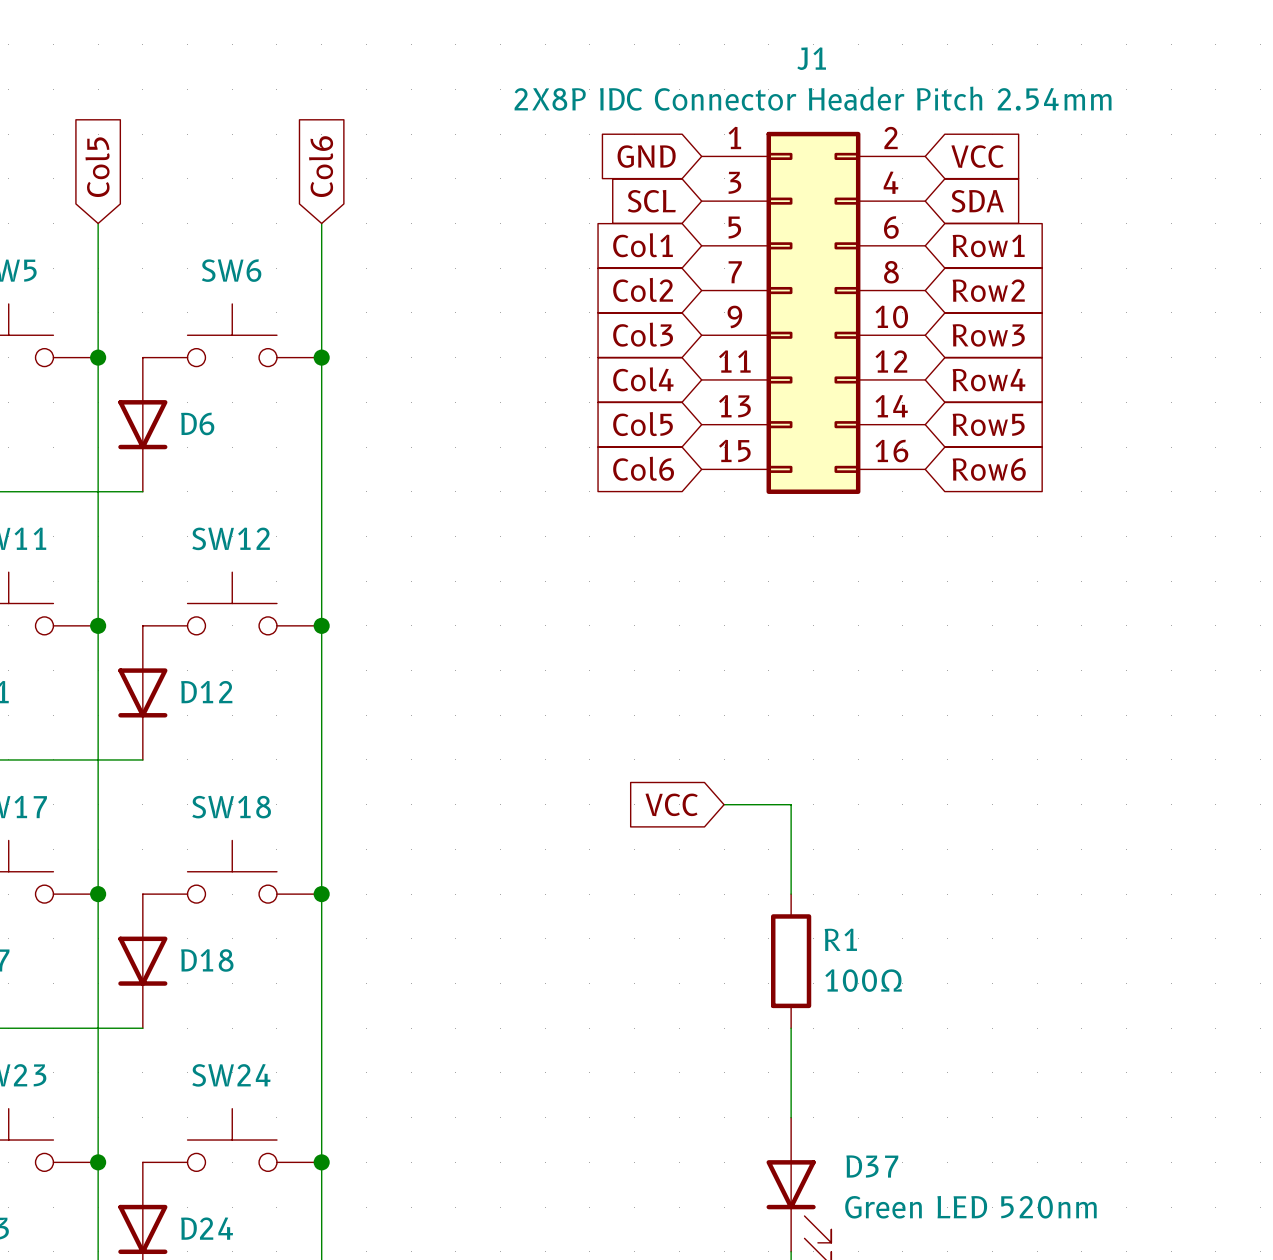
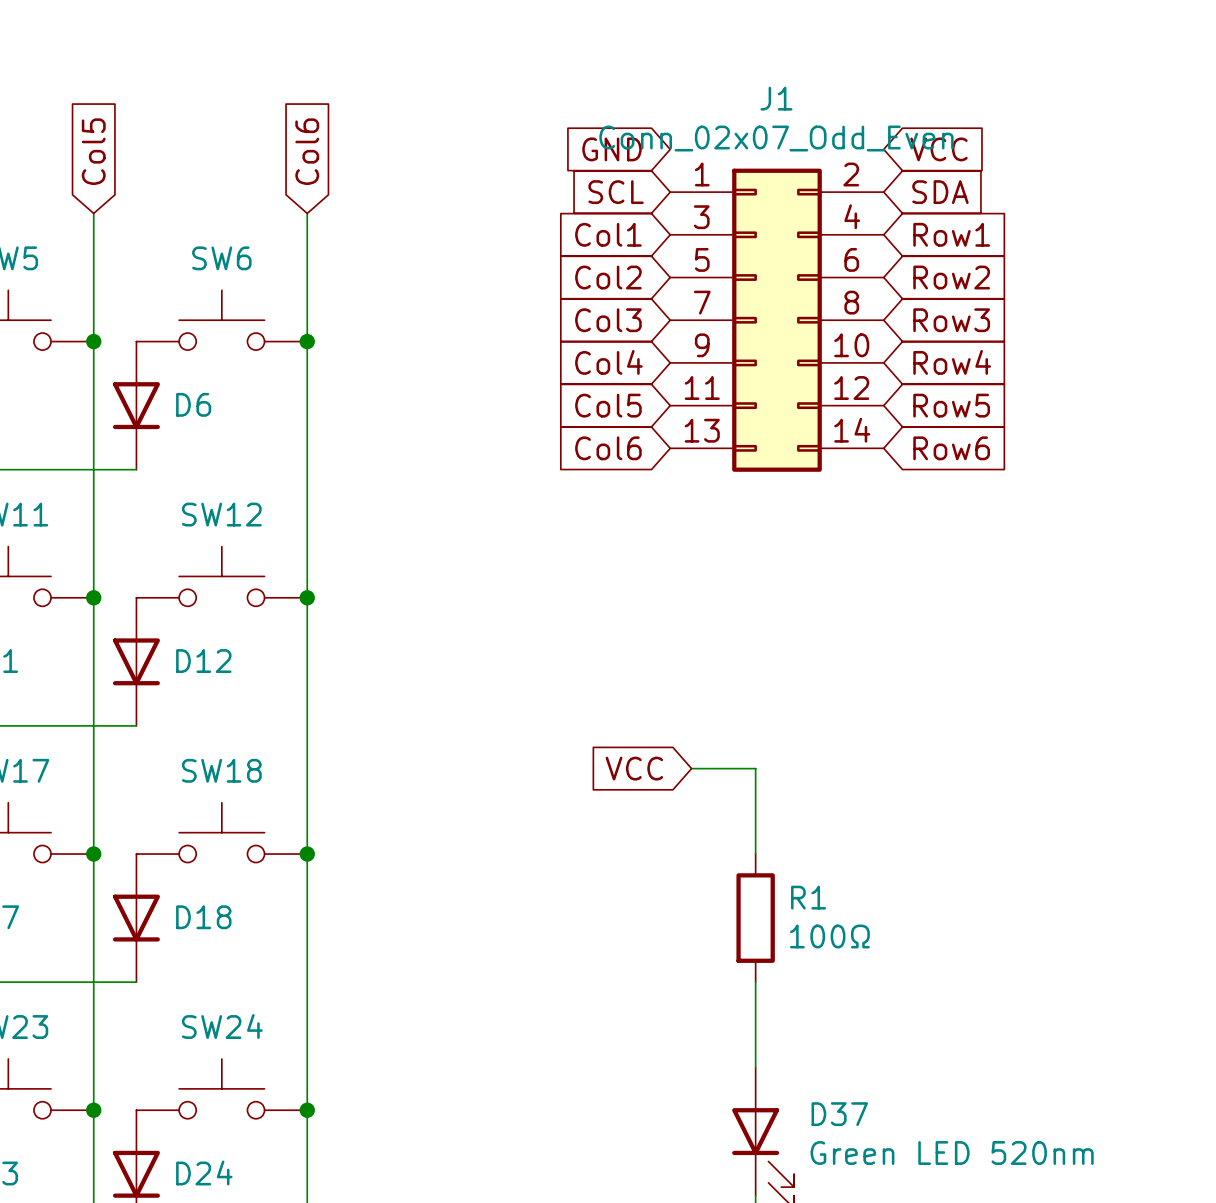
J1 value: 2X8P IDC Connector Header Pitch 2.54mm (813, 98) -> Conn_02x07_Odd_Even (776, 138)
J1 symbol: [701, 131, 926, 494] -> [670, 168, 884, 472]

